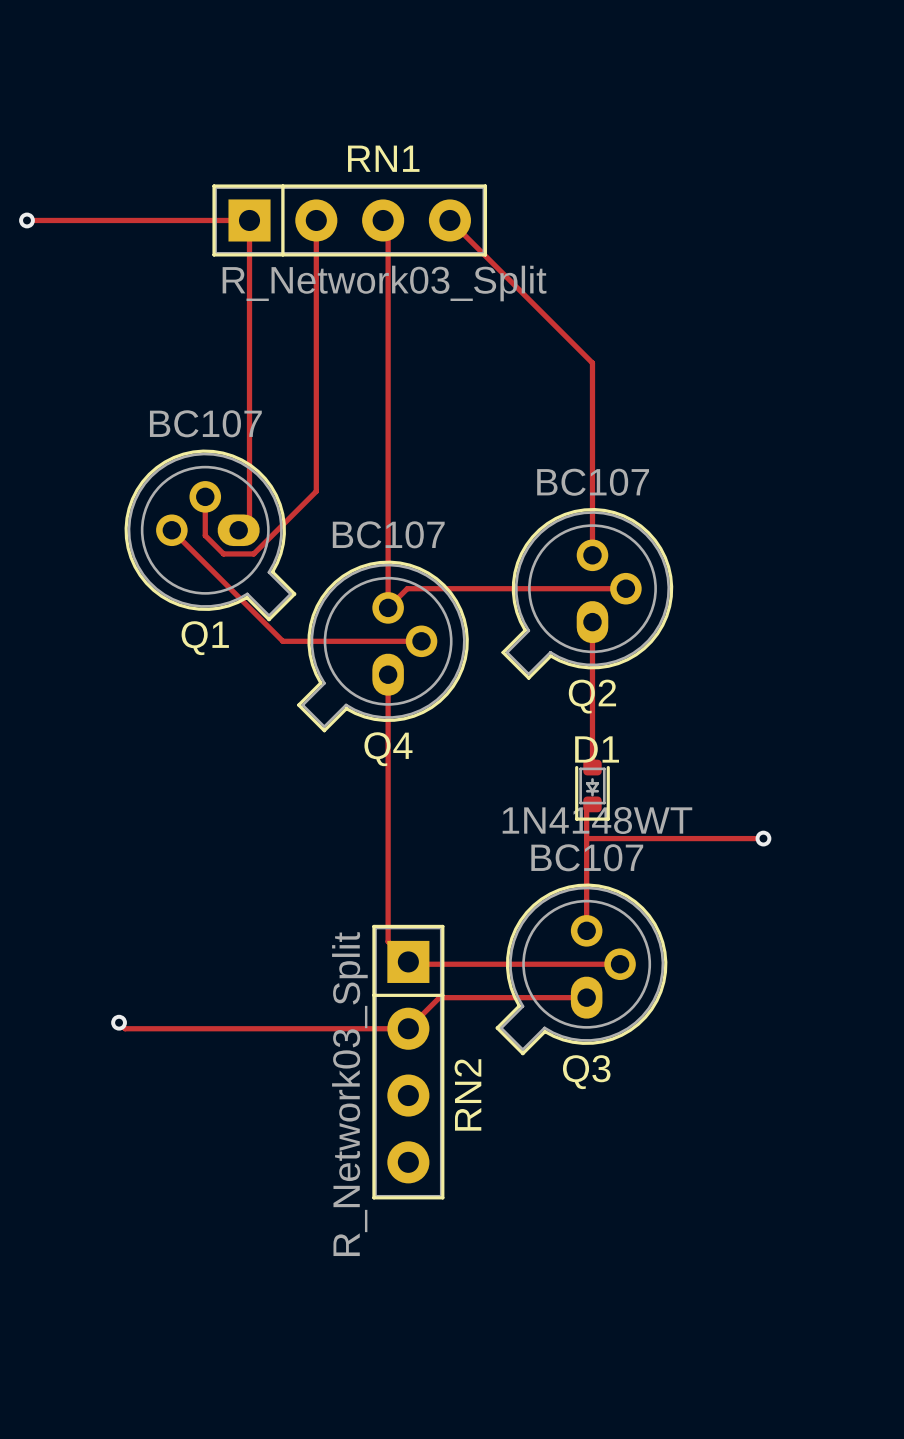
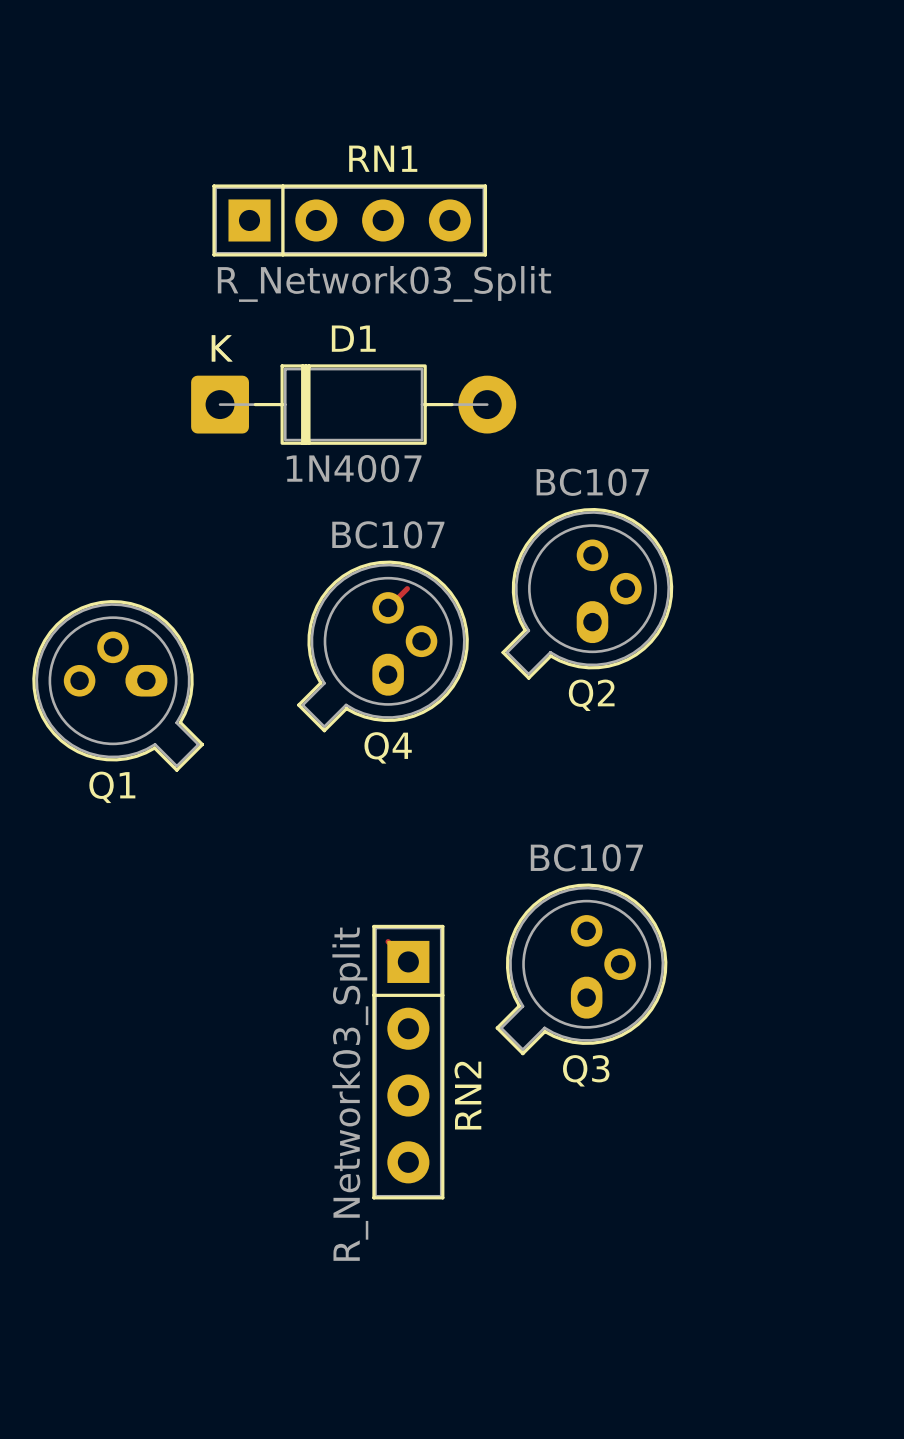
top track: (26, 220) (249, 220) (249, 519) (238, 530) -> none
via: (26, 220) -> none
top track: (316, 220) (316, 491) (253, 553) (223, 553) (205, 535) (205, 496) -> none
top track: (449, 220) (592, 363) (592, 555) -> none
top track: (388, 225) (388, 607) -> none
Q1 value: BC107 (205, 423) -> none
top track: (171, 530) (282, 641) (421, 641) -> none
Q1 position: (210, 535) -> (118, 685)
top track: (407, 588) (625, 588) -> none
top track: (592, 622) (592, 767) -> none
top track: (388, 674) (388, 941) -> none
D1 footprint: [575, 759, 610, 821] -> [191, 364, 517, 445]
top track: (592, 804) (586, 810) (586, 930) -> none
D1 value: 1N4148WT (597, 820) -> 1N4007 (354, 468)
top track: (586, 838) (763, 838) -> none
via: (763, 838) -> none
top track: (410, 964) (620, 964) -> none
top track: (586, 997) (439, 997) (408, 1028) (125, 1028) (119, 1022) -> none
via: (119, 1022) -> none

